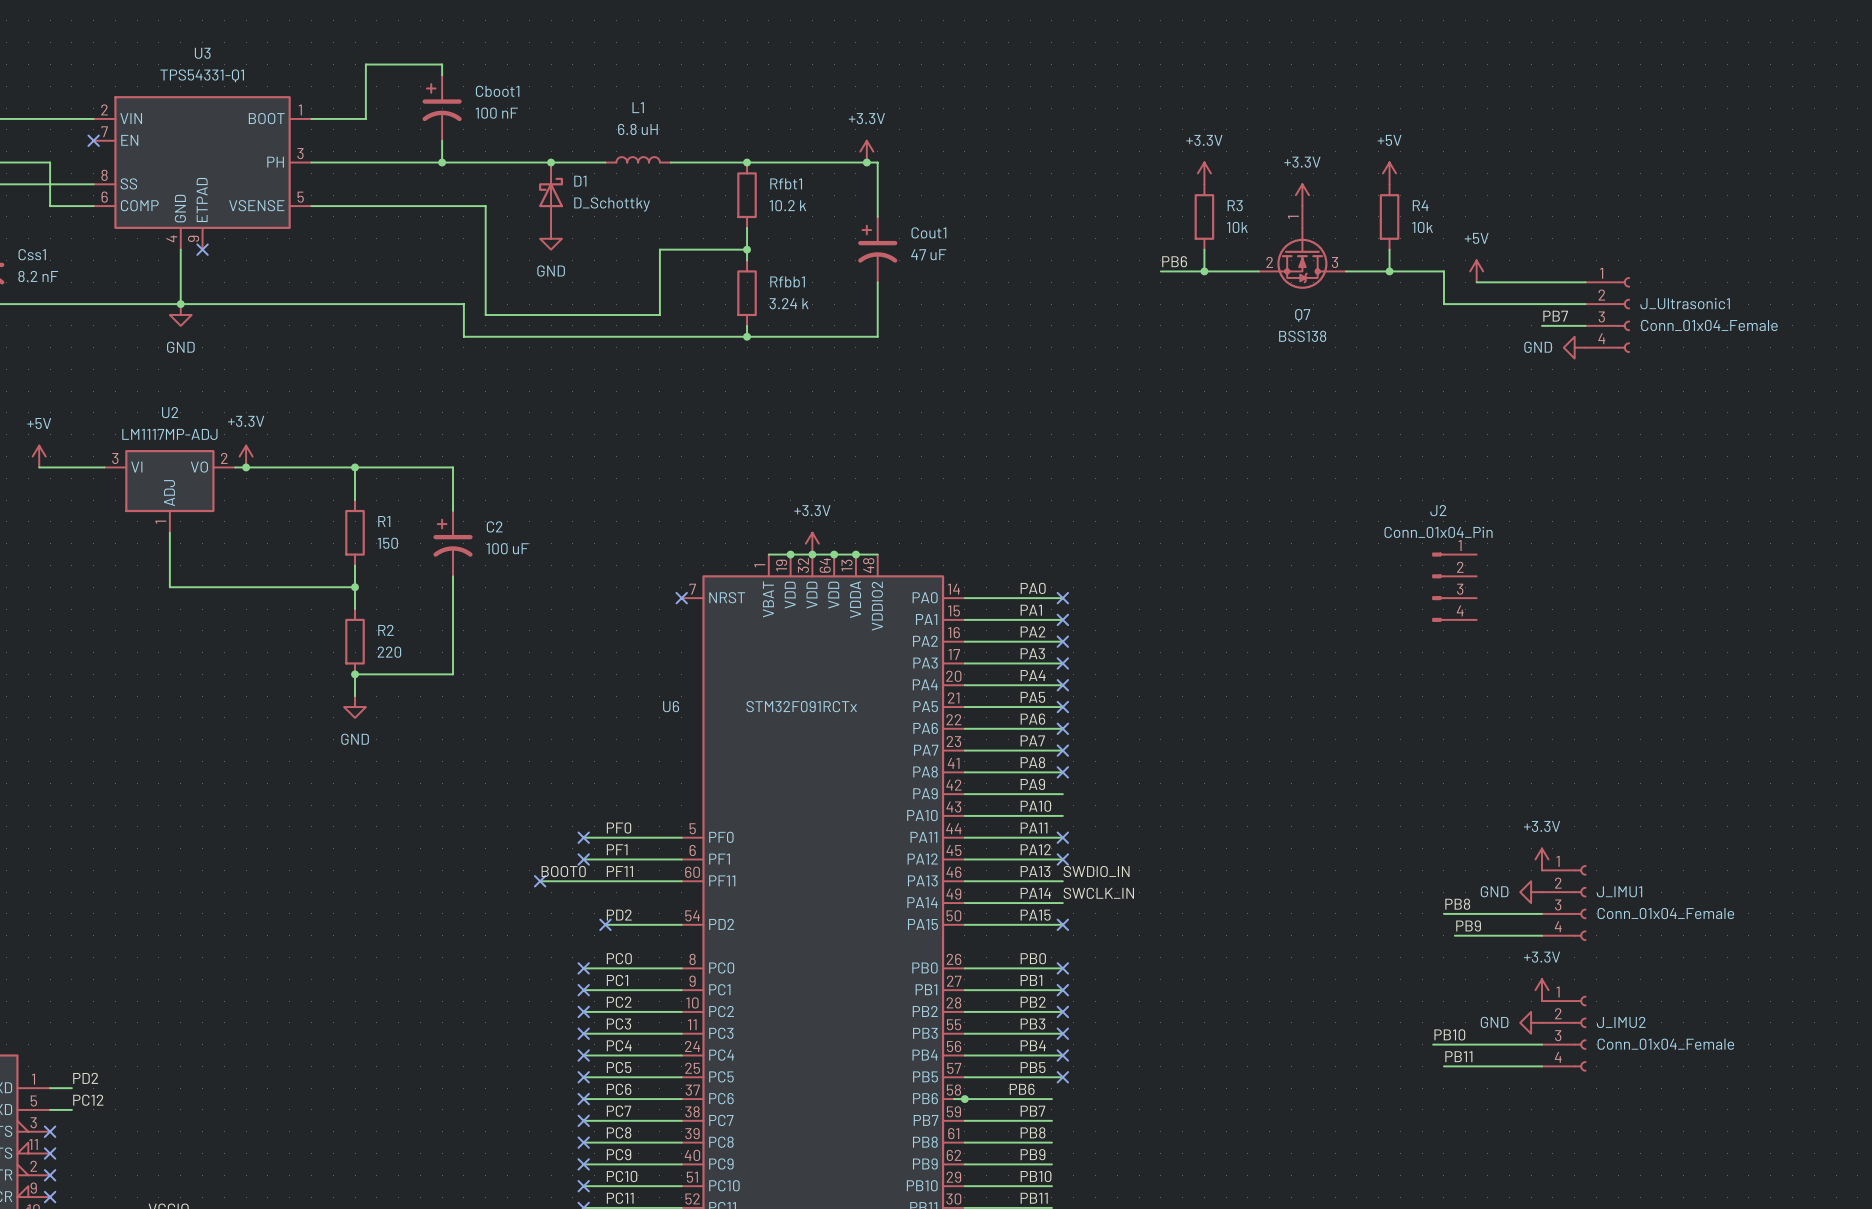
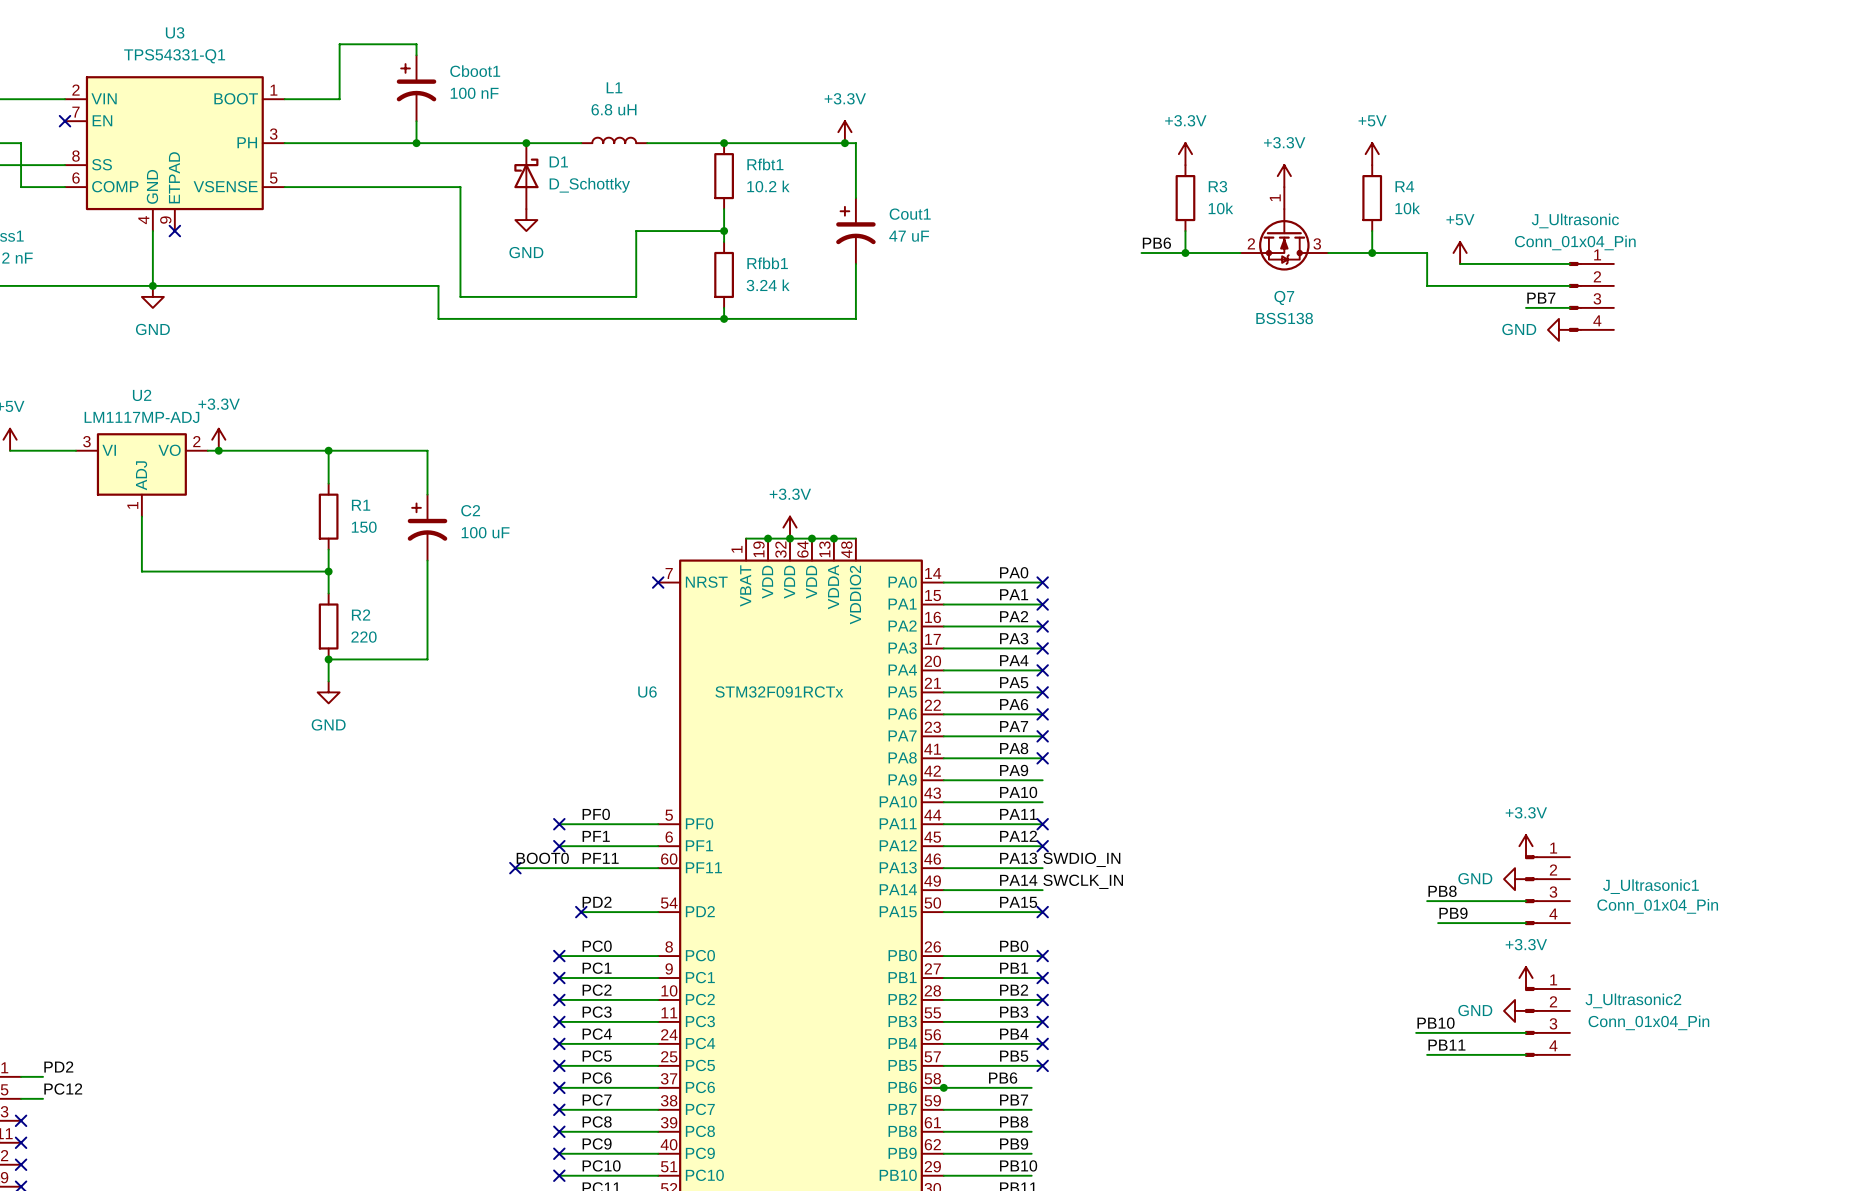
J_Ultrasonic1 symbol: [1585, 277, 1630, 353] -> [1525, 855, 1570, 925]
J_Ultrasonic: none -> Conn_01x04_Pin (1591, 296)
J_Ultrasonic1 value: Conn_01x04_Female (1709, 325) -> Conn_01x04_Pin (1657, 906)
J2: Conn_01x04_Pin (1454, 587) -> none
J_IMU1: Conn_01x04_Female (1564, 903) -> none
J_Ultrasonic2: none -> Conn_01x04_Pin (1547, 1021)
J_IMU2: Conn_01x04_Female (1564, 1033) -> none

